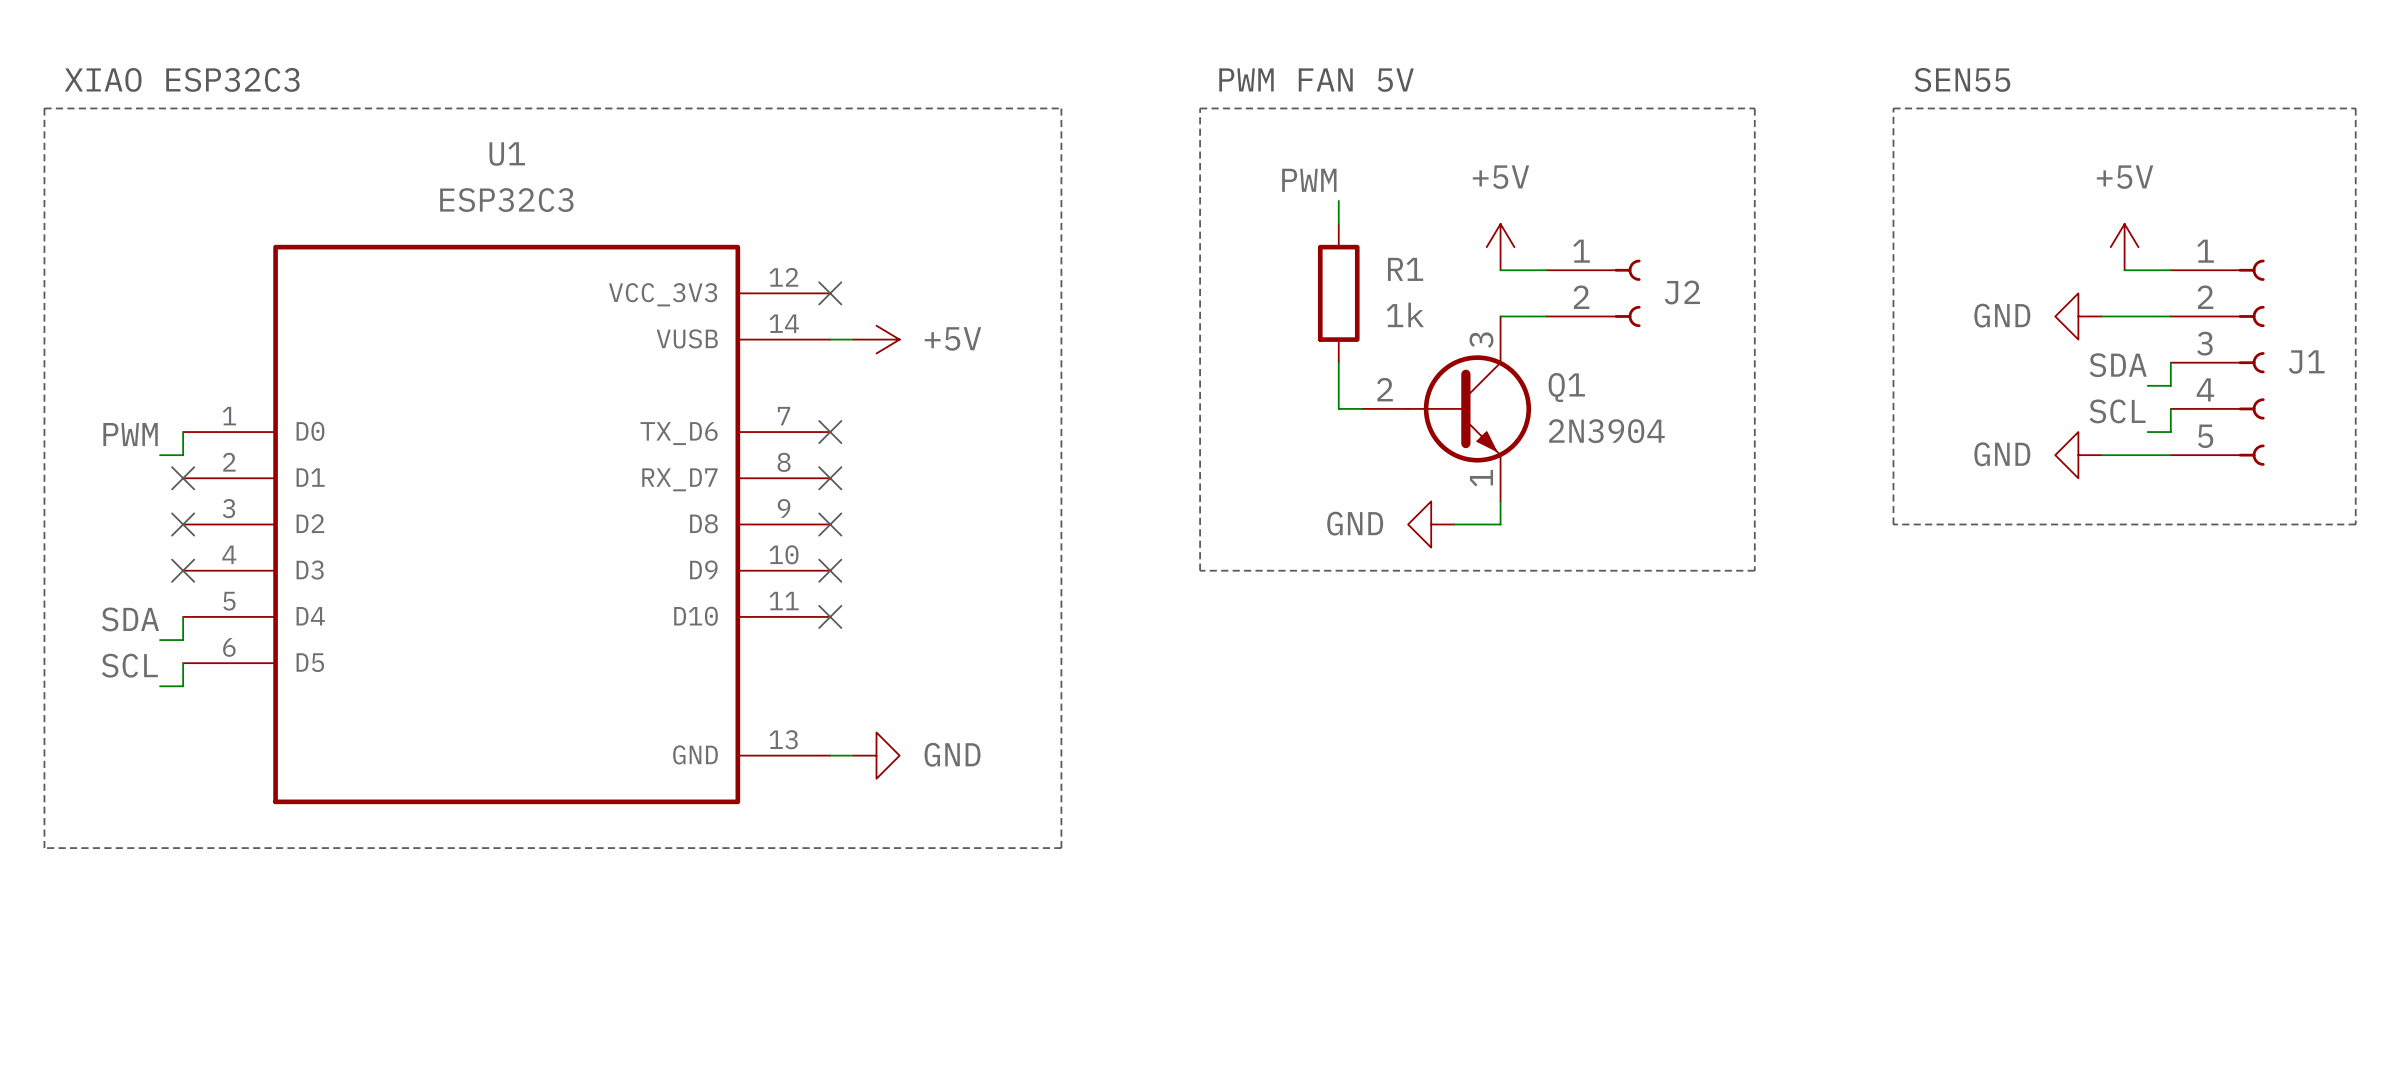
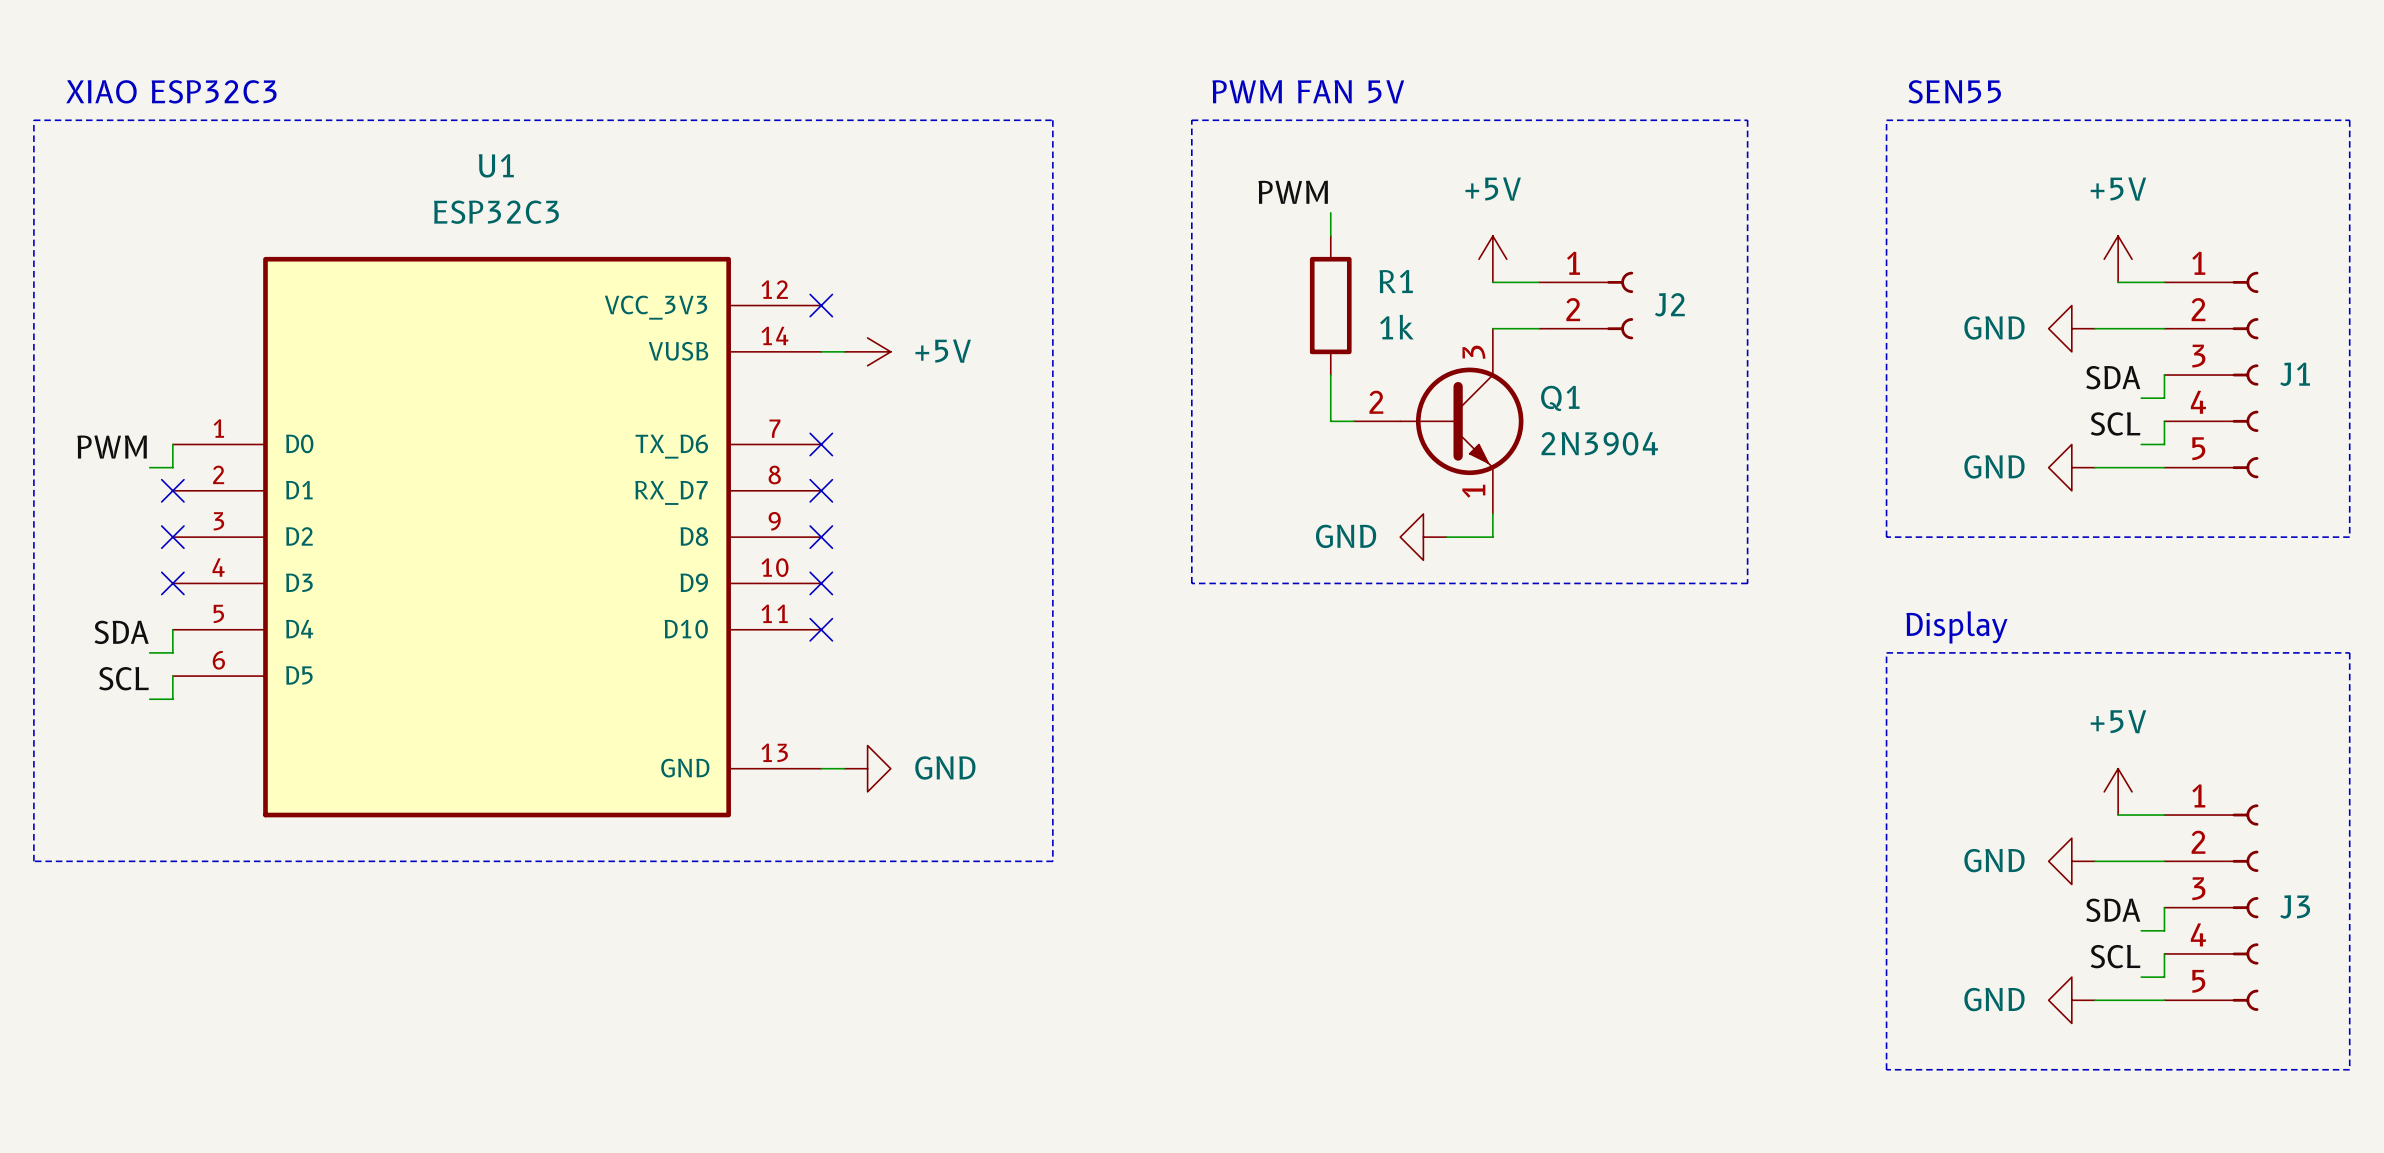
text: none -> Display (1956, 627)
line: none -> (1886, 652) (2349, 652) (2349, 1069) (1886, 1069) (1886, 652)
power symbol: none -> +5V (2118, 791)
wire: none -> (2118, 815) (2164, 815)
power symbol: none -> GND (2071, 861)
wire: none -> (2094, 861) (2164, 861)
wire: none -> (2164, 907) (2164, 930) (2141, 930)
J3: none -> (2211, 907)
label: none -> SDA (2113, 910)
wire: none -> (2164, 953) (2164, 977) (2141, 977)
label: none -> SCL (2115, 956)
power symbol: none -> GND (2071, 1000)
wire: none -> (2094, 1000) (2164, 1000)

